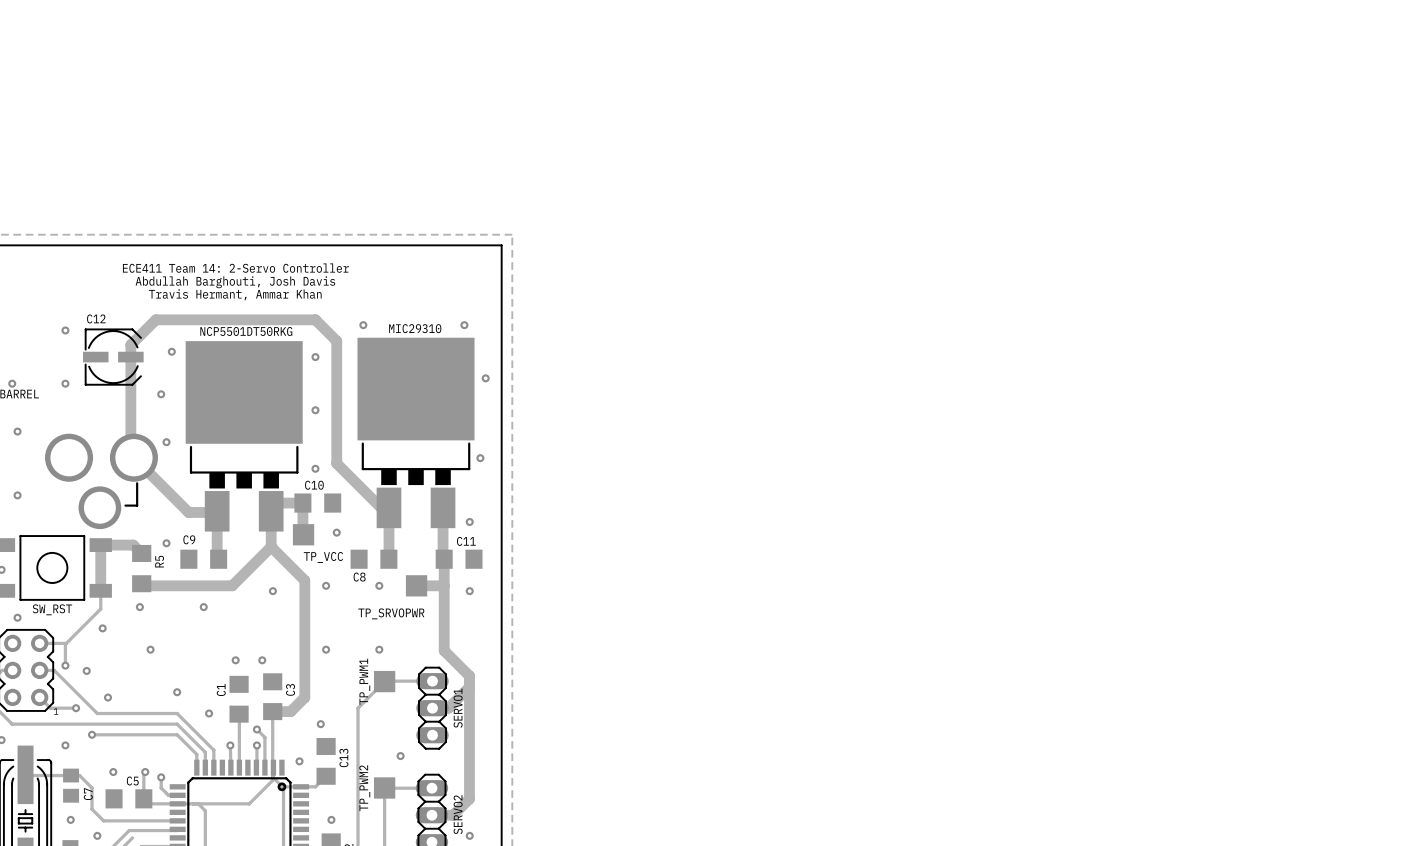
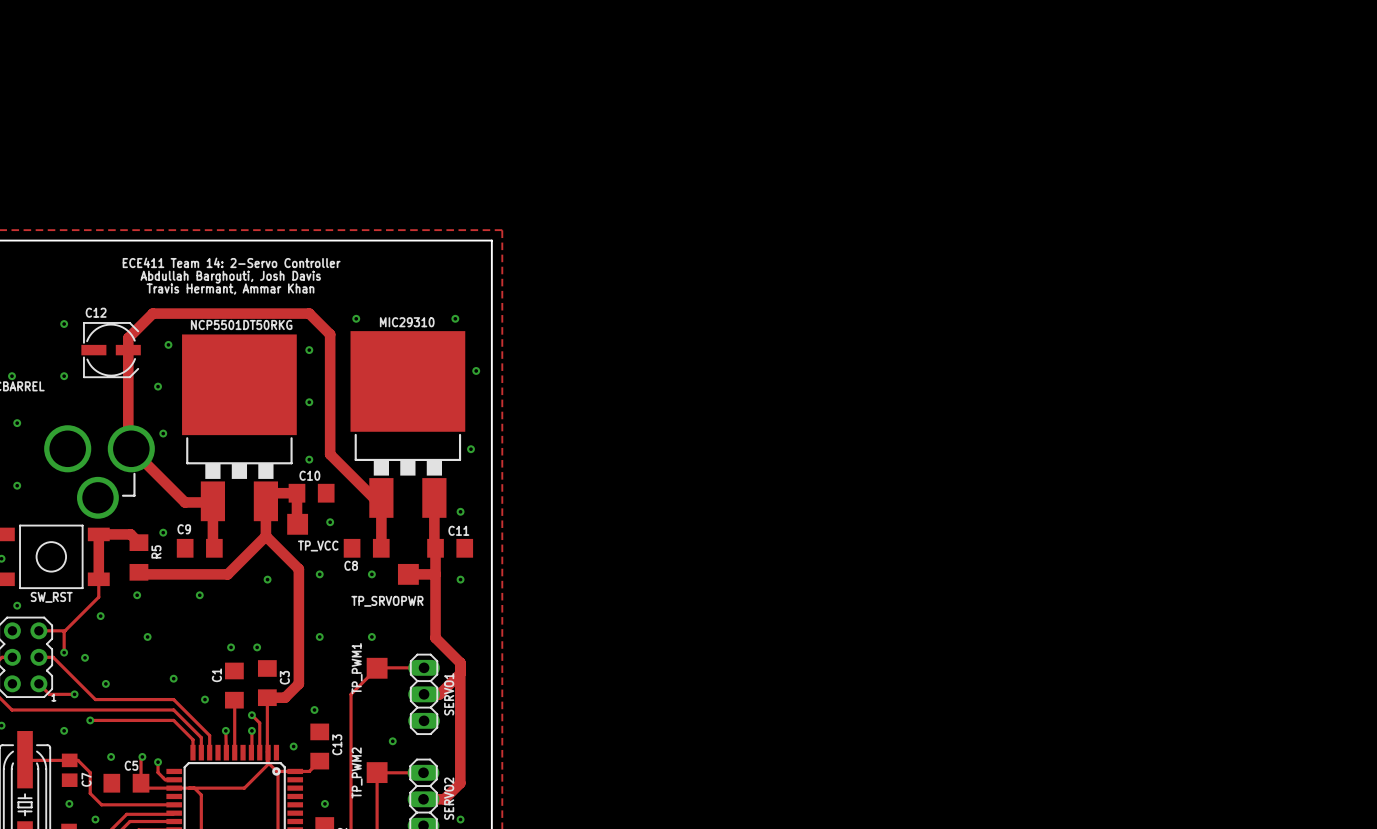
track: none -> (129, 821) (174, 821)

